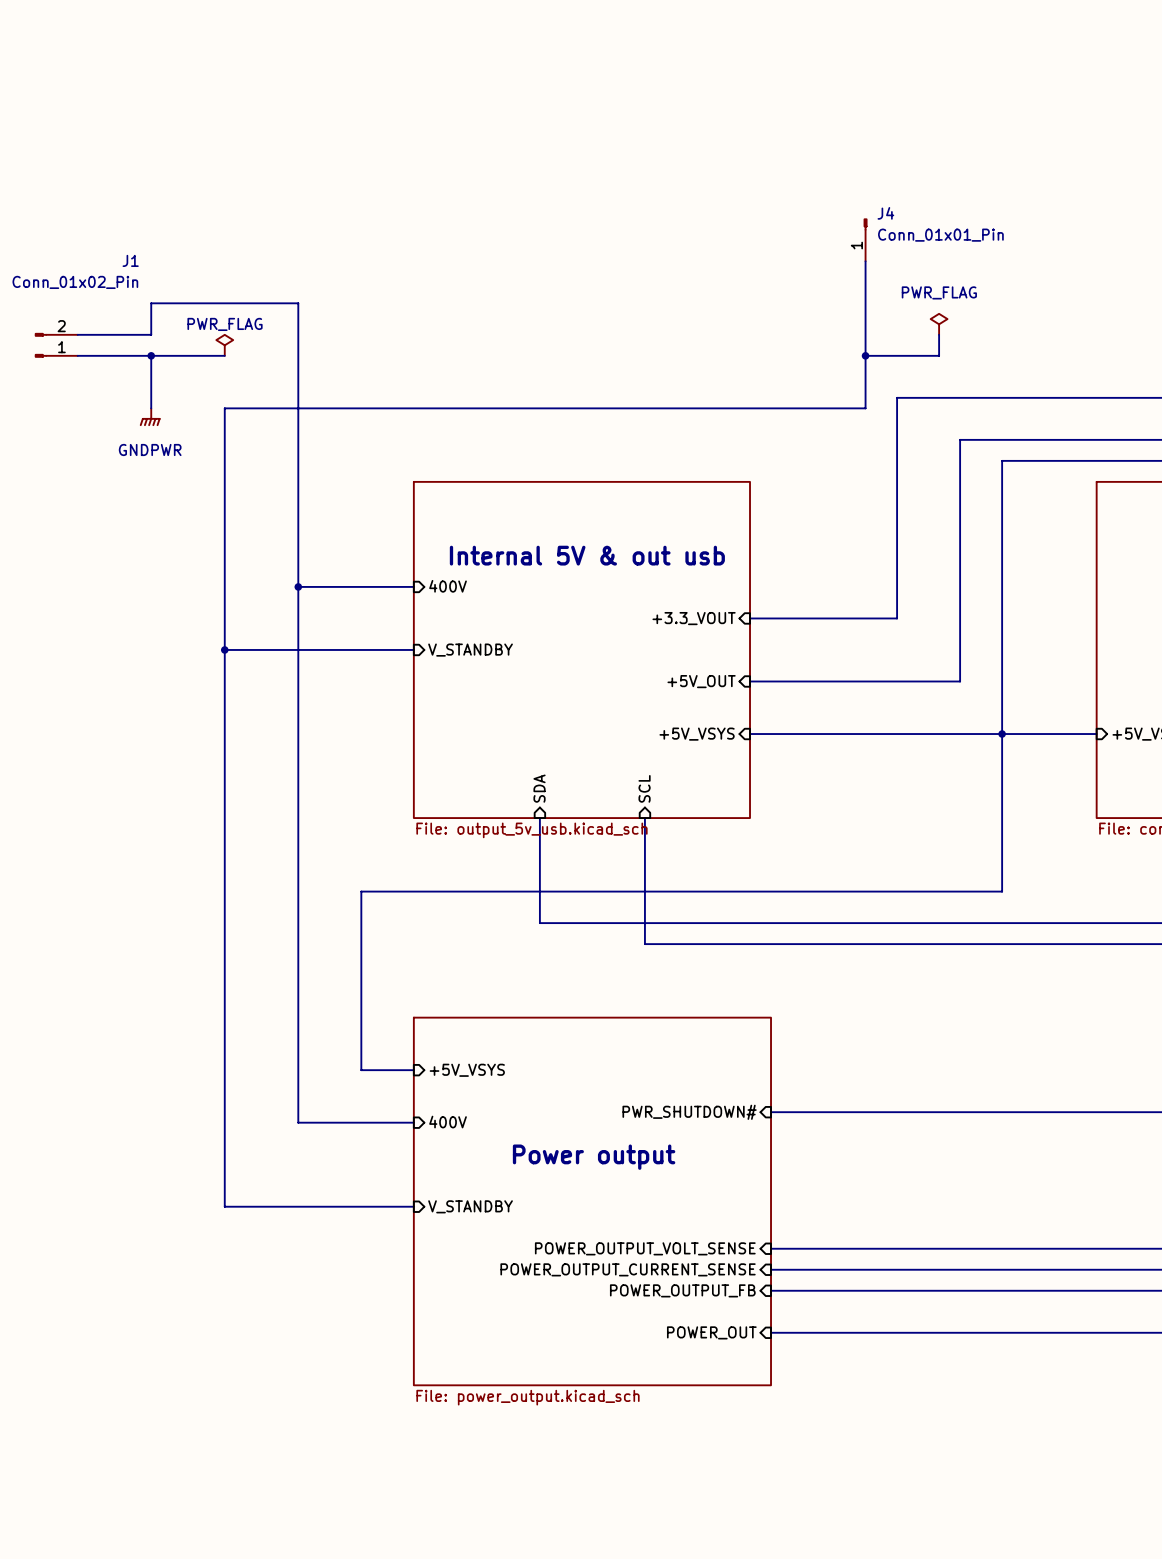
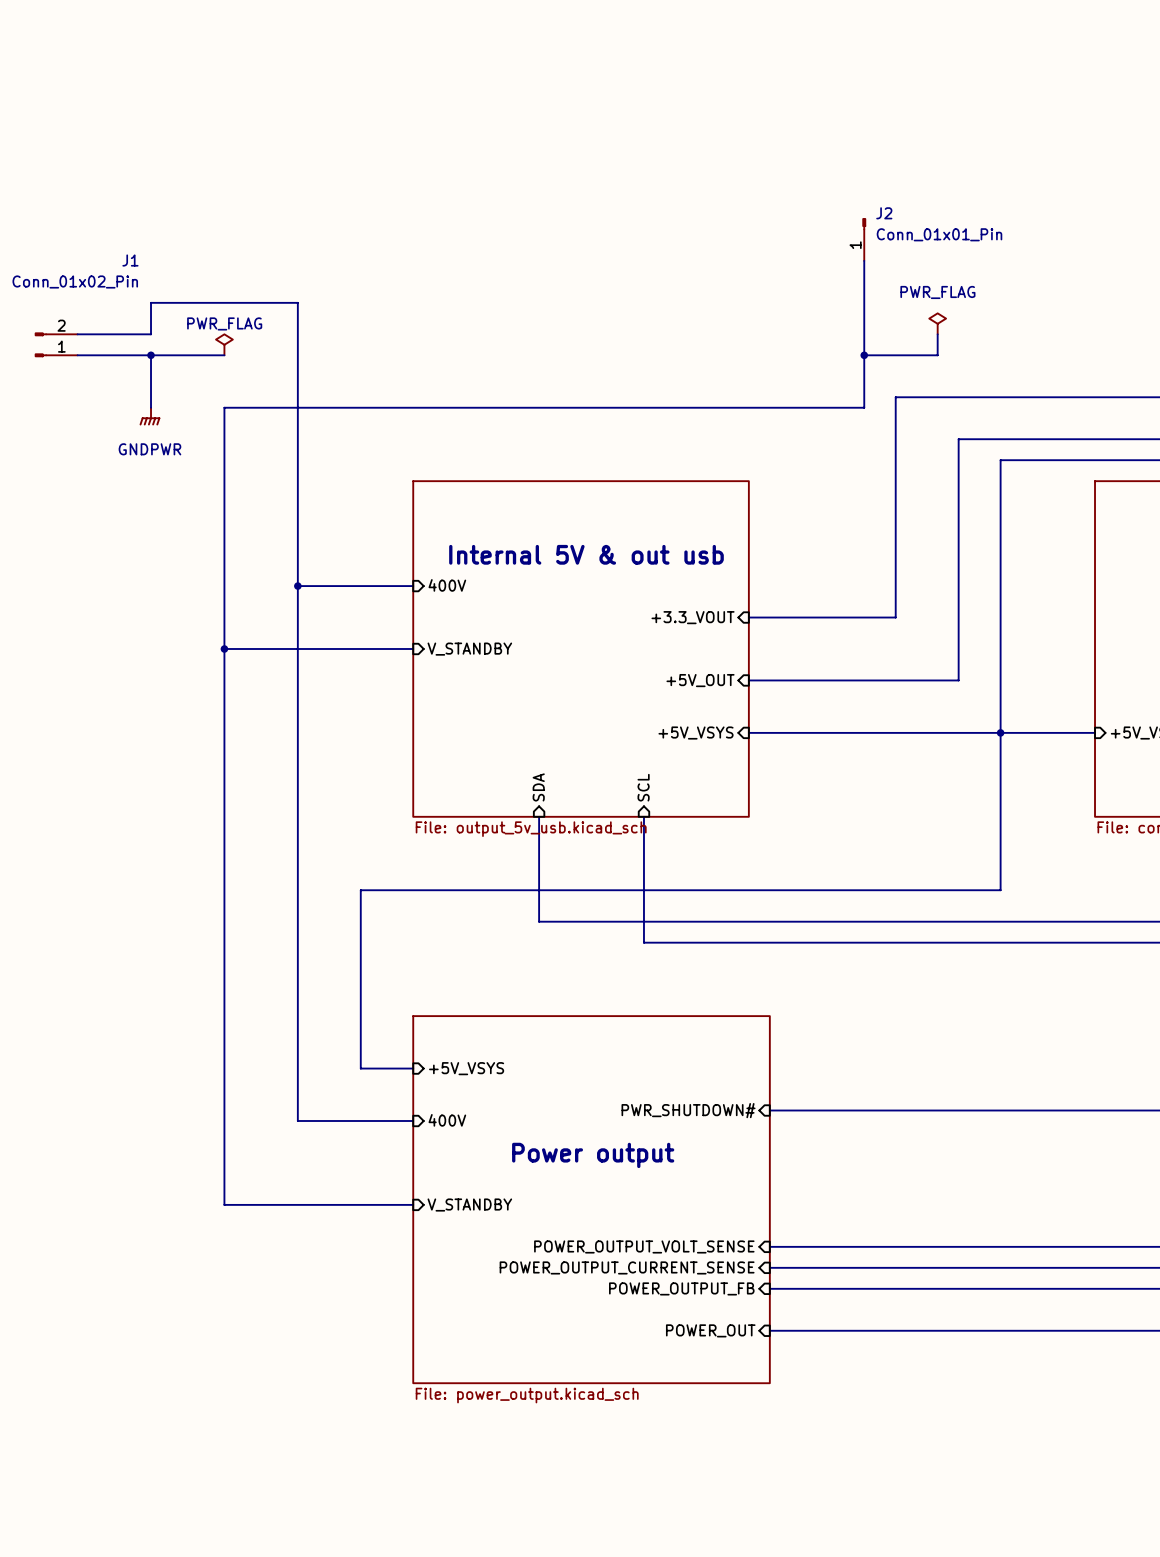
J4 name: J4 (885, 213) -> J2 (884, 213)

